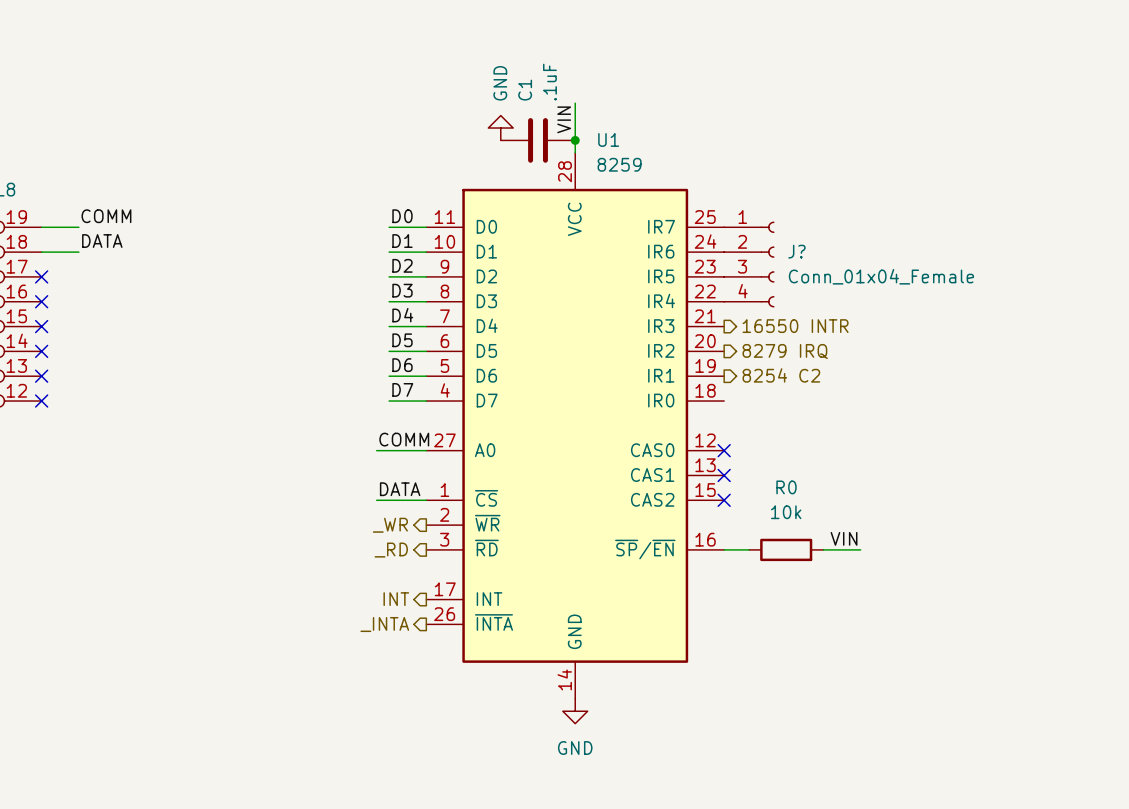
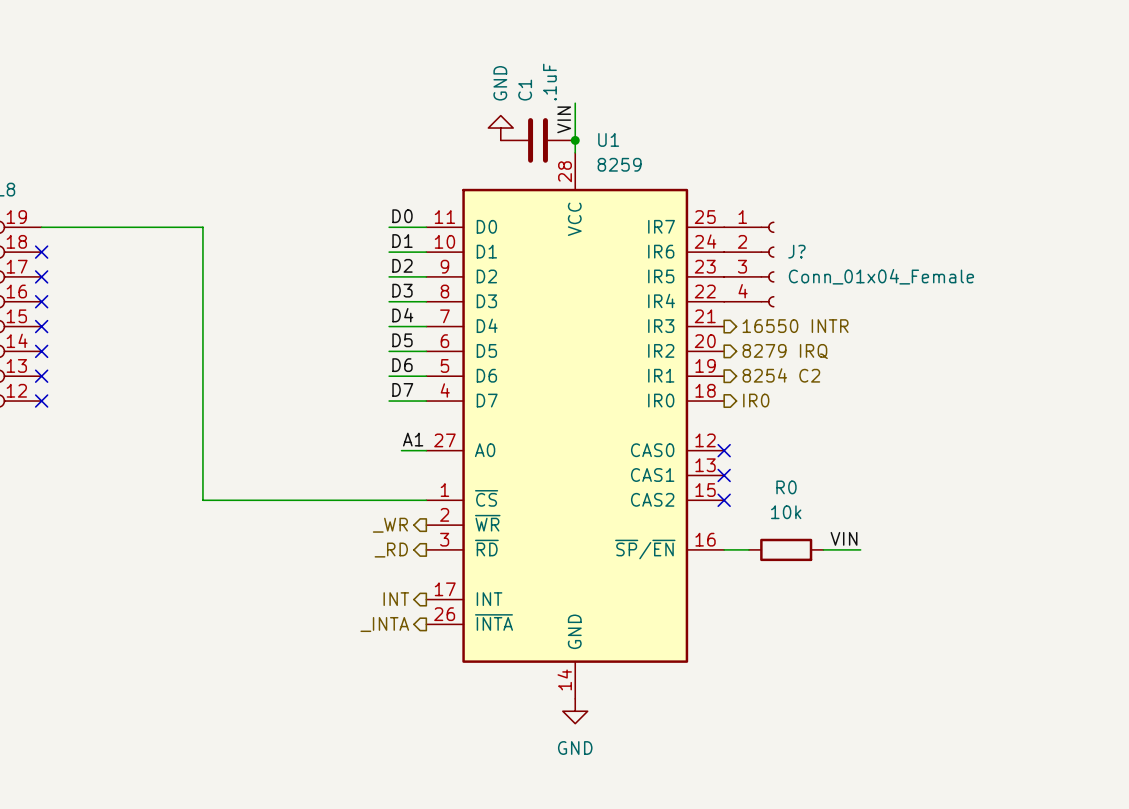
label: COMM (106, 216) -> none
wire: none -> (78, 227) (202, 227) (202, 500) (376, 500)
label: DATA (102, 241) -> none
wire: (41, 252) (78, 252) -> none
no-connect mark: none -> (41, 252)
hierarchical label: none -> IR0 (756, 400)
label: COMM (404, 439) -> none
label: none -> A1 (413, 439)
wire: (376, 450) (401, 450) -> none
label: DATA (400, 489) -> none

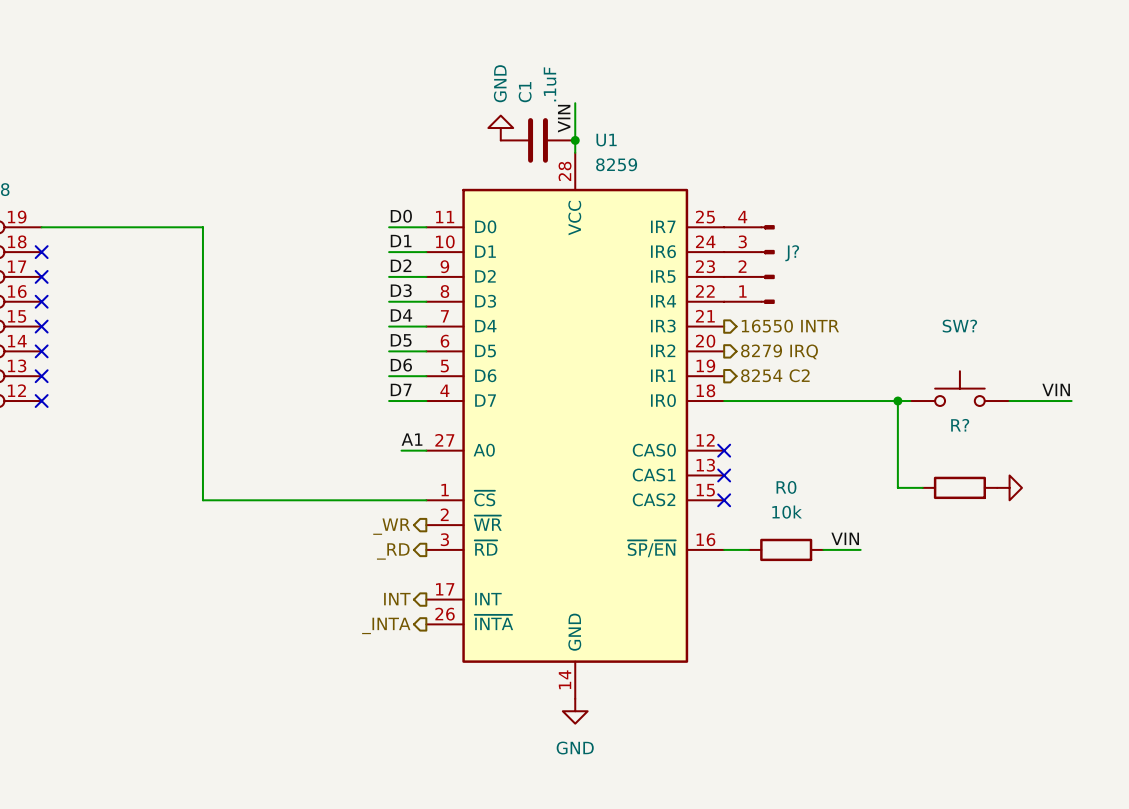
J? symbol: [724, 221, 775, 308] -> [724, 225, 775, 304]
J? value: Conn_01x04_Female (881, 276) -> none
SW?: none -> (959, 388)
label: none -> VIN (1056, 389)
hierarchical label: IR0 (756, 400) -> none
wire: none -> (724, 401) (910, 401)
wire: none -> (897, 401) (897, 487) (922, 487)
junction: none -> (897, 401)
wire: none -> (1009, 401) (1071, 401)
R?: none -> (959, 487)
power symbol: none -> (1009, 487)

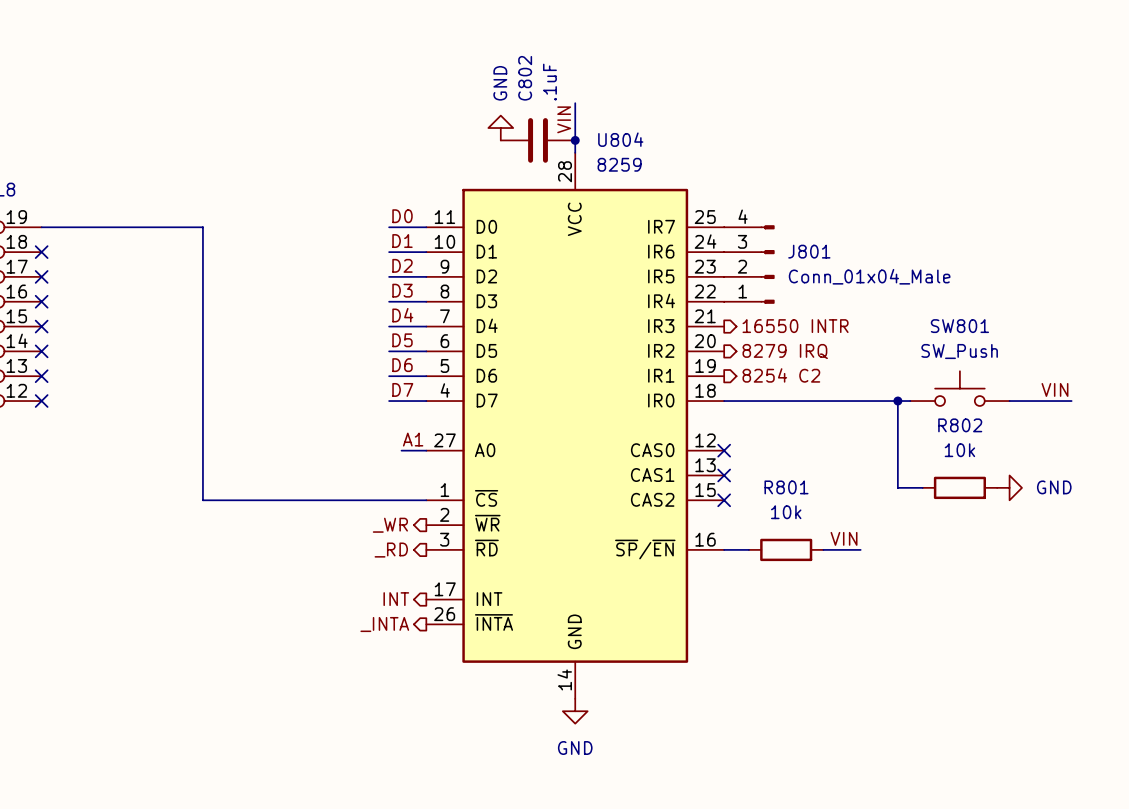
C1 name: C1 (525, 92) -> C802 (525, 78)
U1 name: U1 (606, 140) -> U804 (620, 139)
J? name: J? (792, 253) -> J801 (809, 251)
J? value: none -> Conn_01x04_Male (869, 276)
SW? name: SW? (959, 326) -> SW801 (959, 326)
SW? value: none -> SW_Push (959, 351)
R? name: R? (960, 425) -> R802 (960, 425)
R? value: none -> 10k (959, 450)
R0 name: R0 (786, 487) -> R801 (786, 487)
power symbol text: none -> GND (1054, 487)

